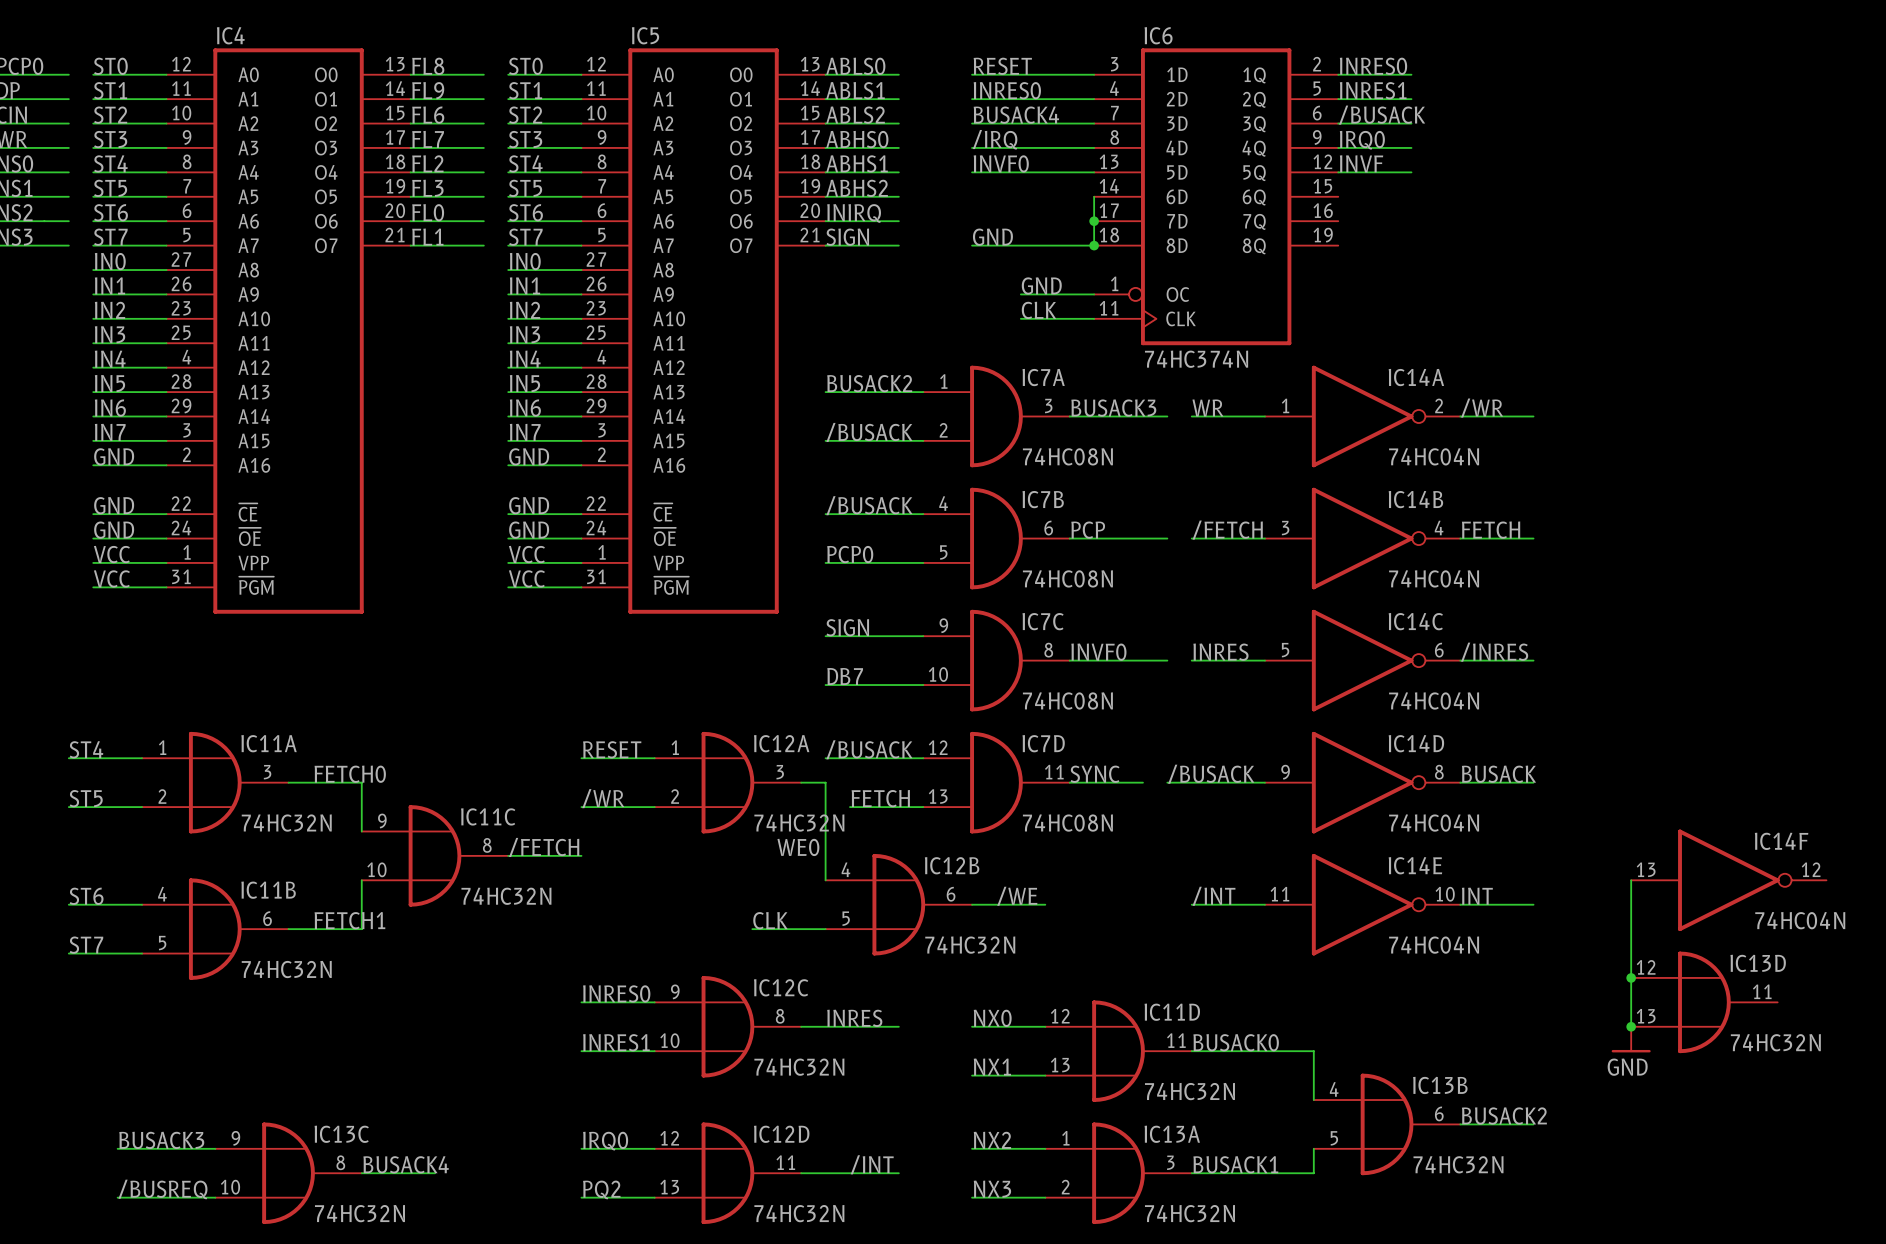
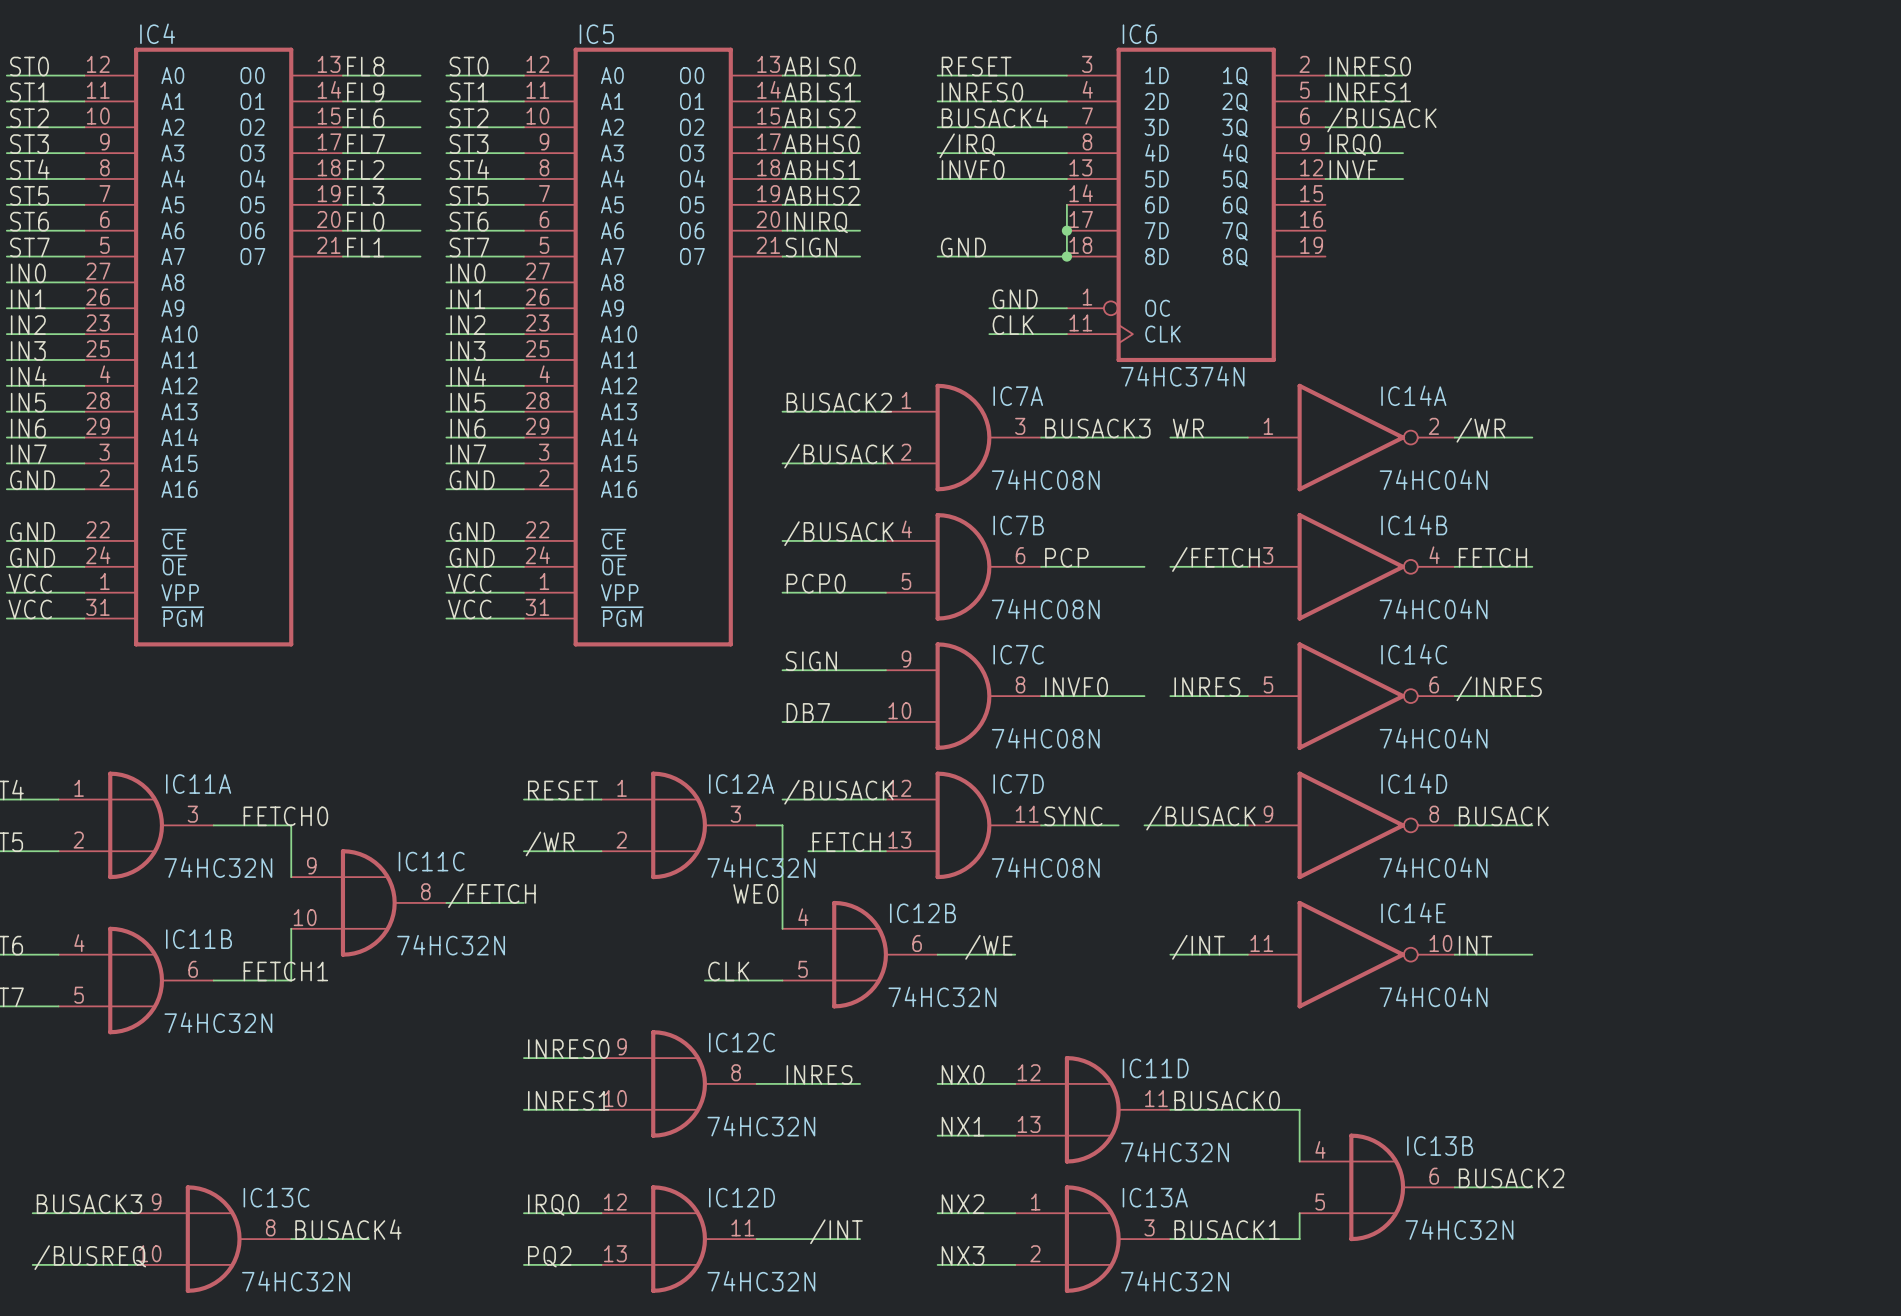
wire: (1631, 880) (1631, 1026) -> none
IC14F: 74HC04N (1728, 880) -> none
junction: (1631, 977) -> none
IC13D: 74HC32N (1704, 1002) -> none
junction: (1631, 1026) -> none
power symbol: GND (1631, 1039) -> none

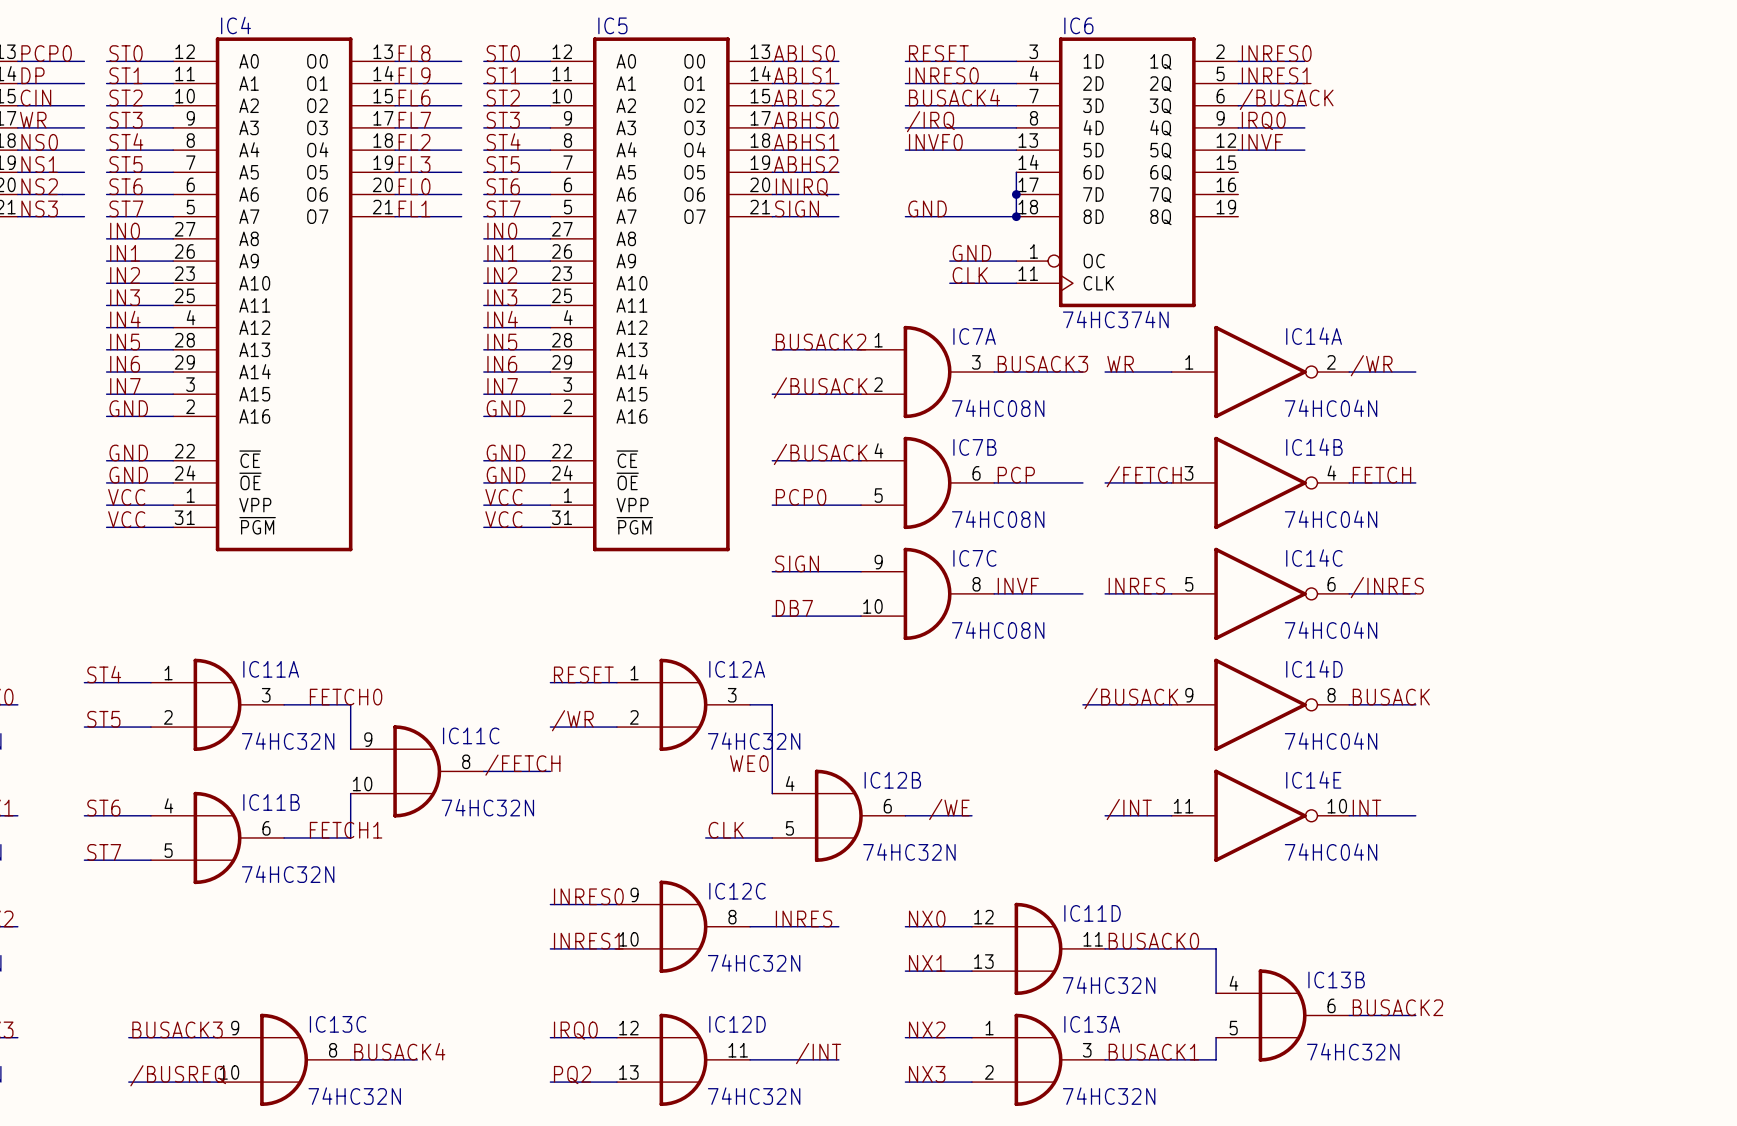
label: INVF0 (1076, 687) -> INVF (1018, 586)
label: /BUSACK (838, 792) -> none
wire: (782, 799) (885, 799) -> none
label: SYNC (1073, 816) -> none
IC7D: 74HC08N (963, 825) -> none
wire: (1041, 825) (1118, 825) -> none
label: FETCH (846, 842) -> none
wire: (808, 851) (885, 851) -> none

